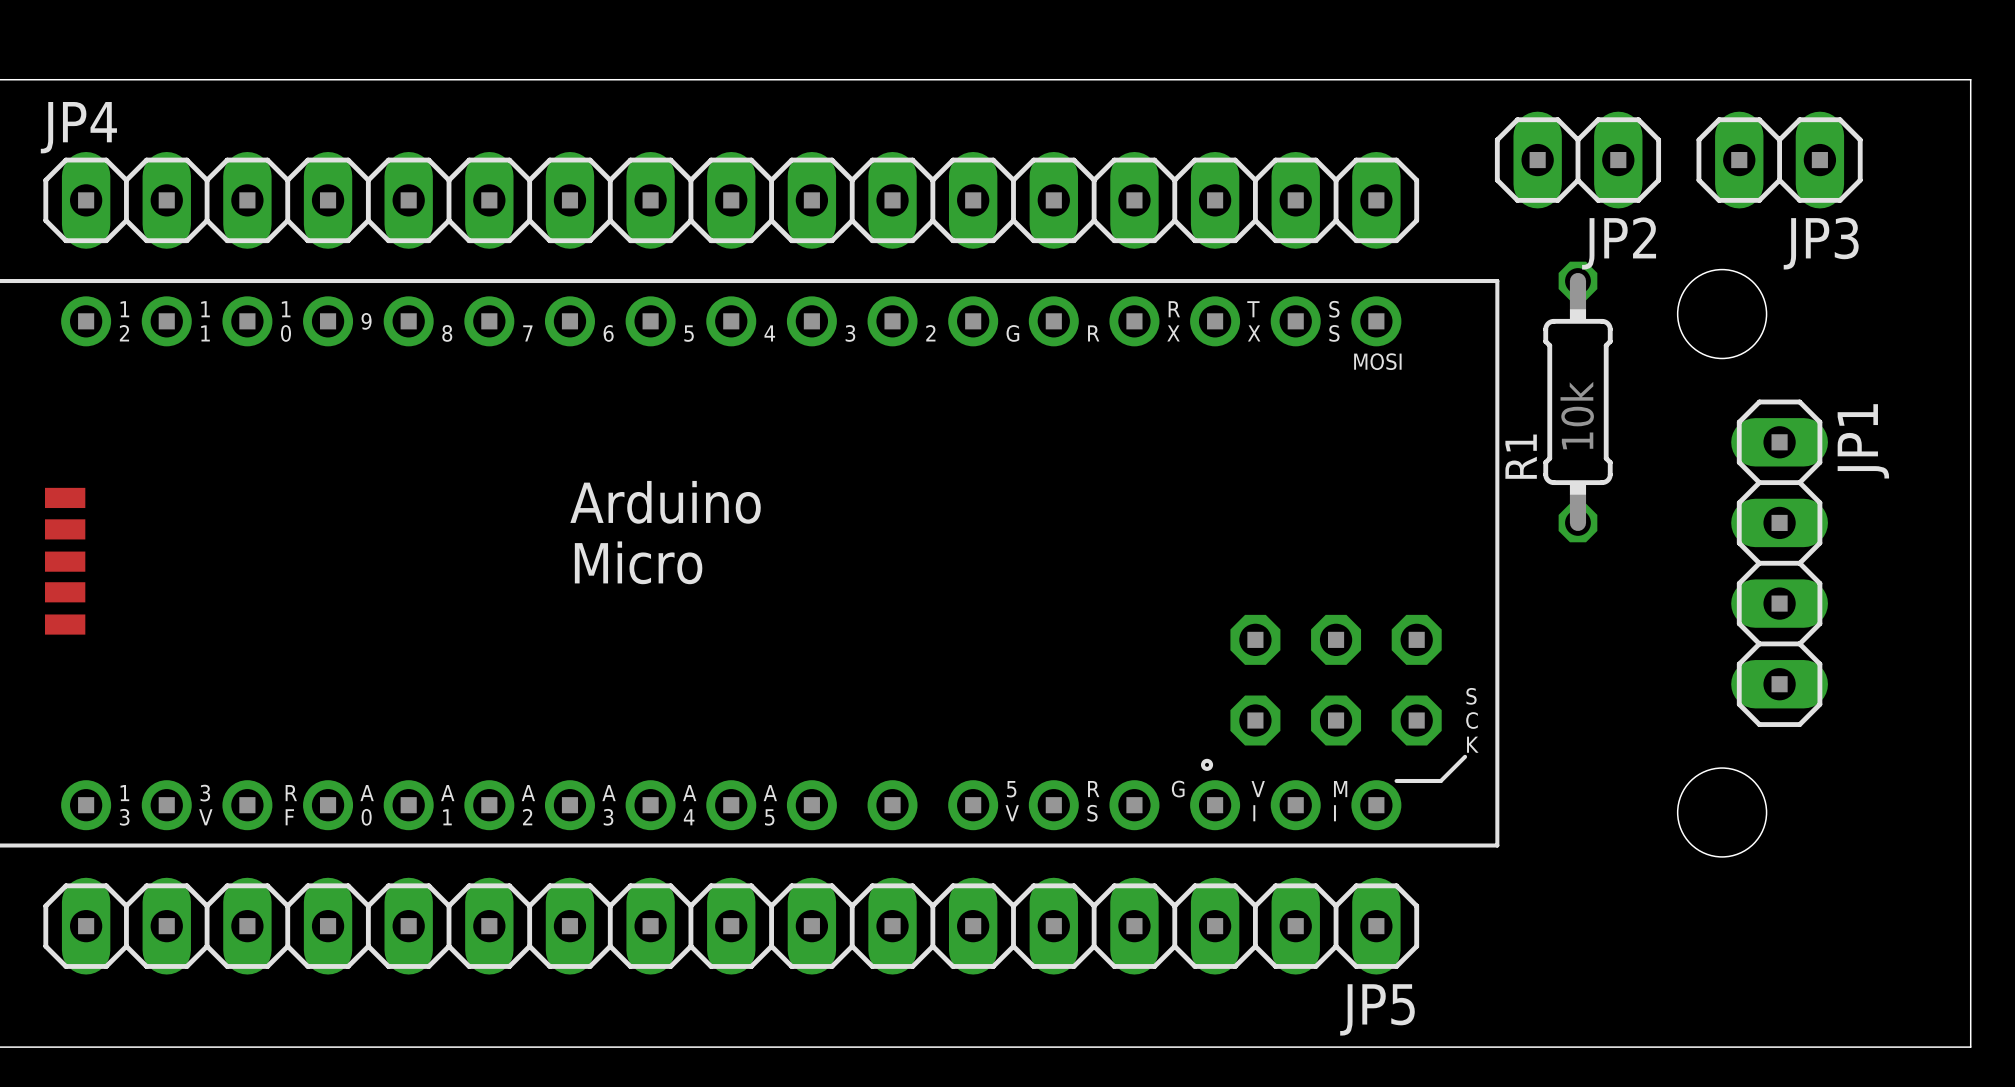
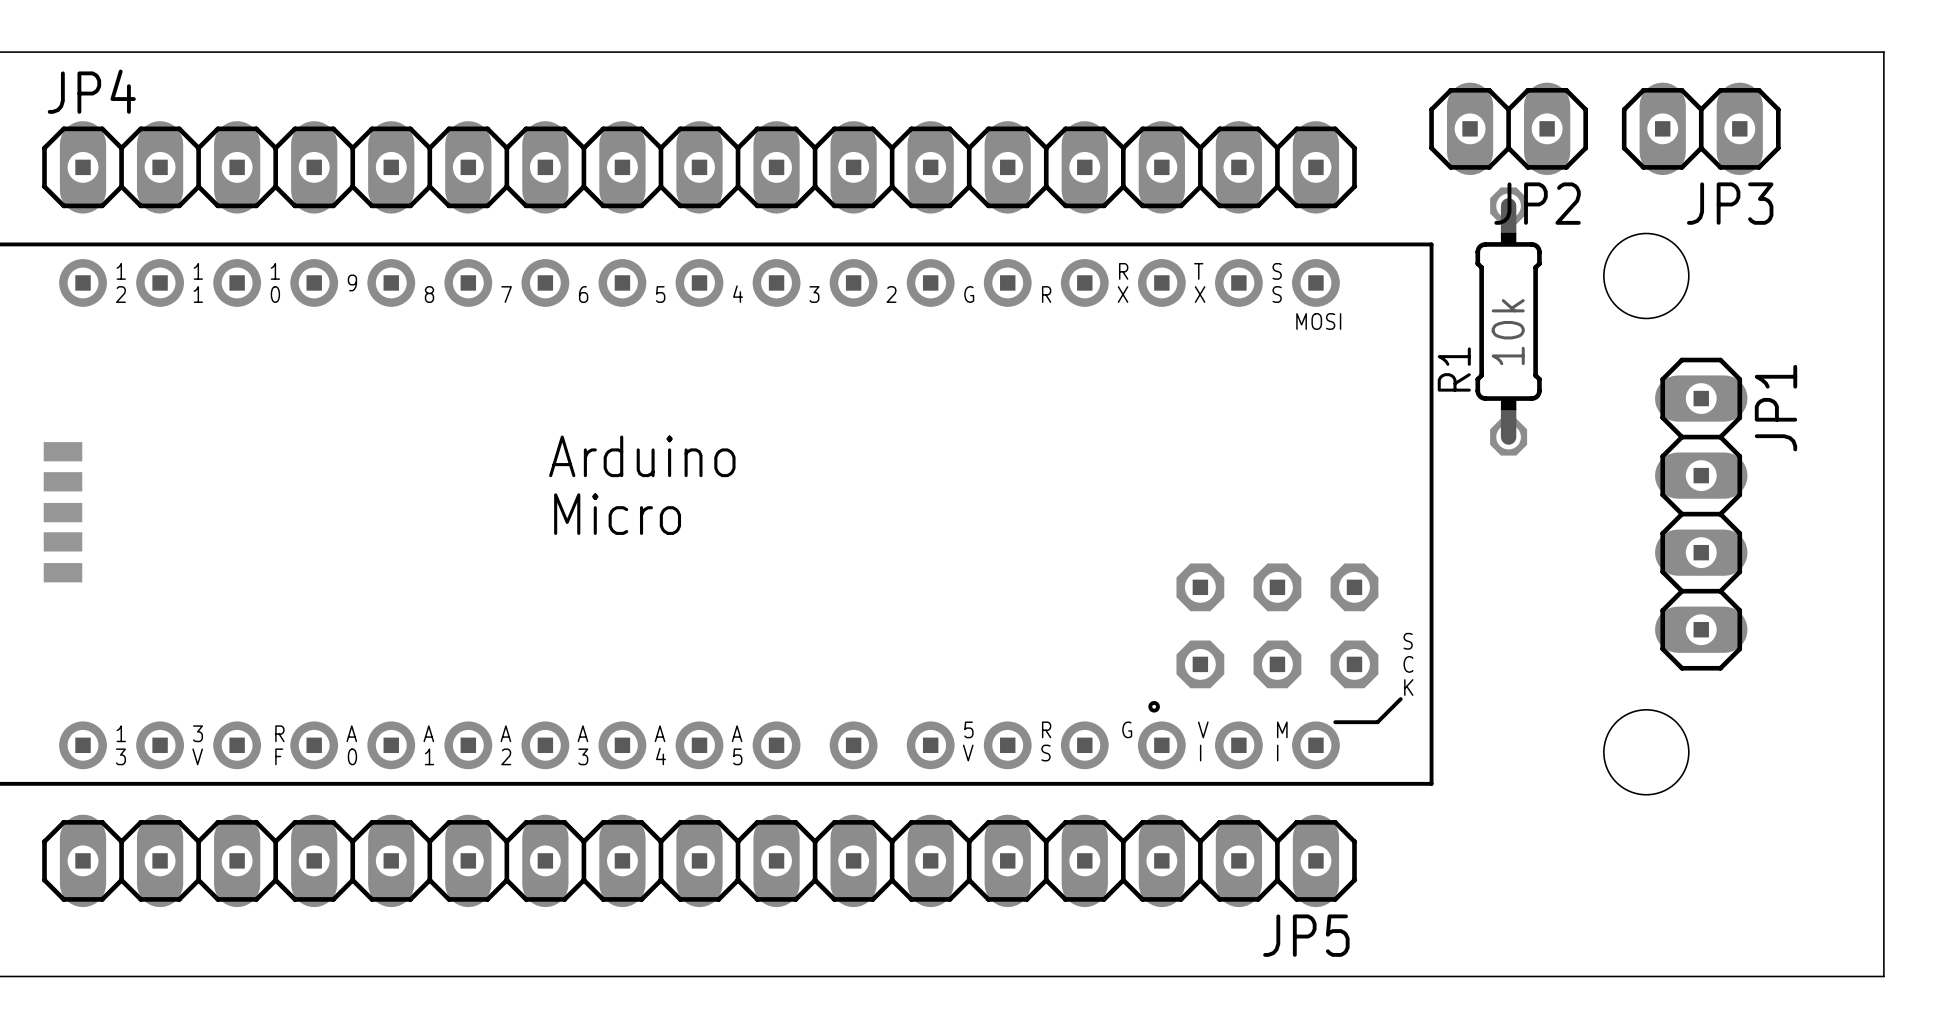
R1 position: (1577, 401) -> (1508, 321)

